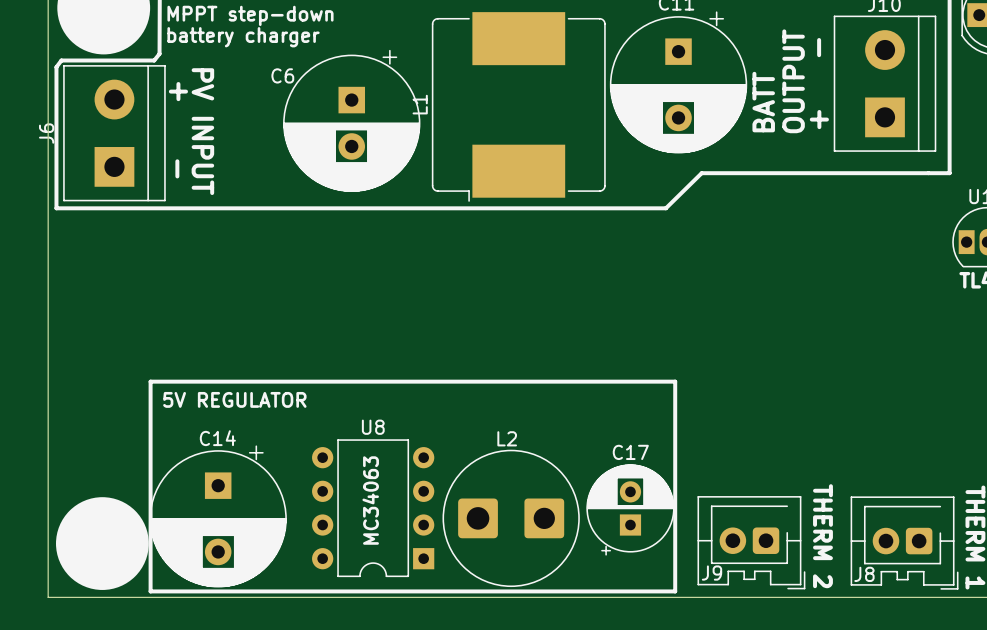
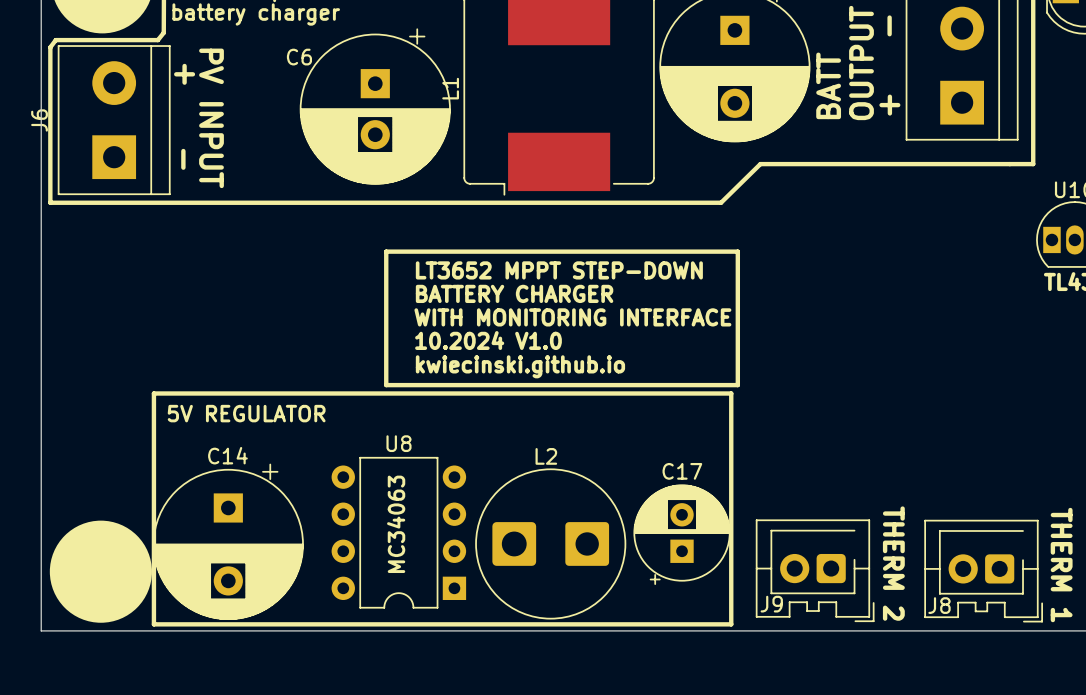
line: none -> (386, 251) (737, 251) (737, 385) (386, 385) (386, 251)
text: none -> LT3652 MPPT STEP-DOWN (559, 270)
text: none -> BATTERY CHARGER (514, 293)
text: none -> WITH MONITORING INTERFACE (572, 317)
text: none -> 10.2024 V1.0 (488, 340)
text: none -> kwiecinski.github.io (520, 366)

